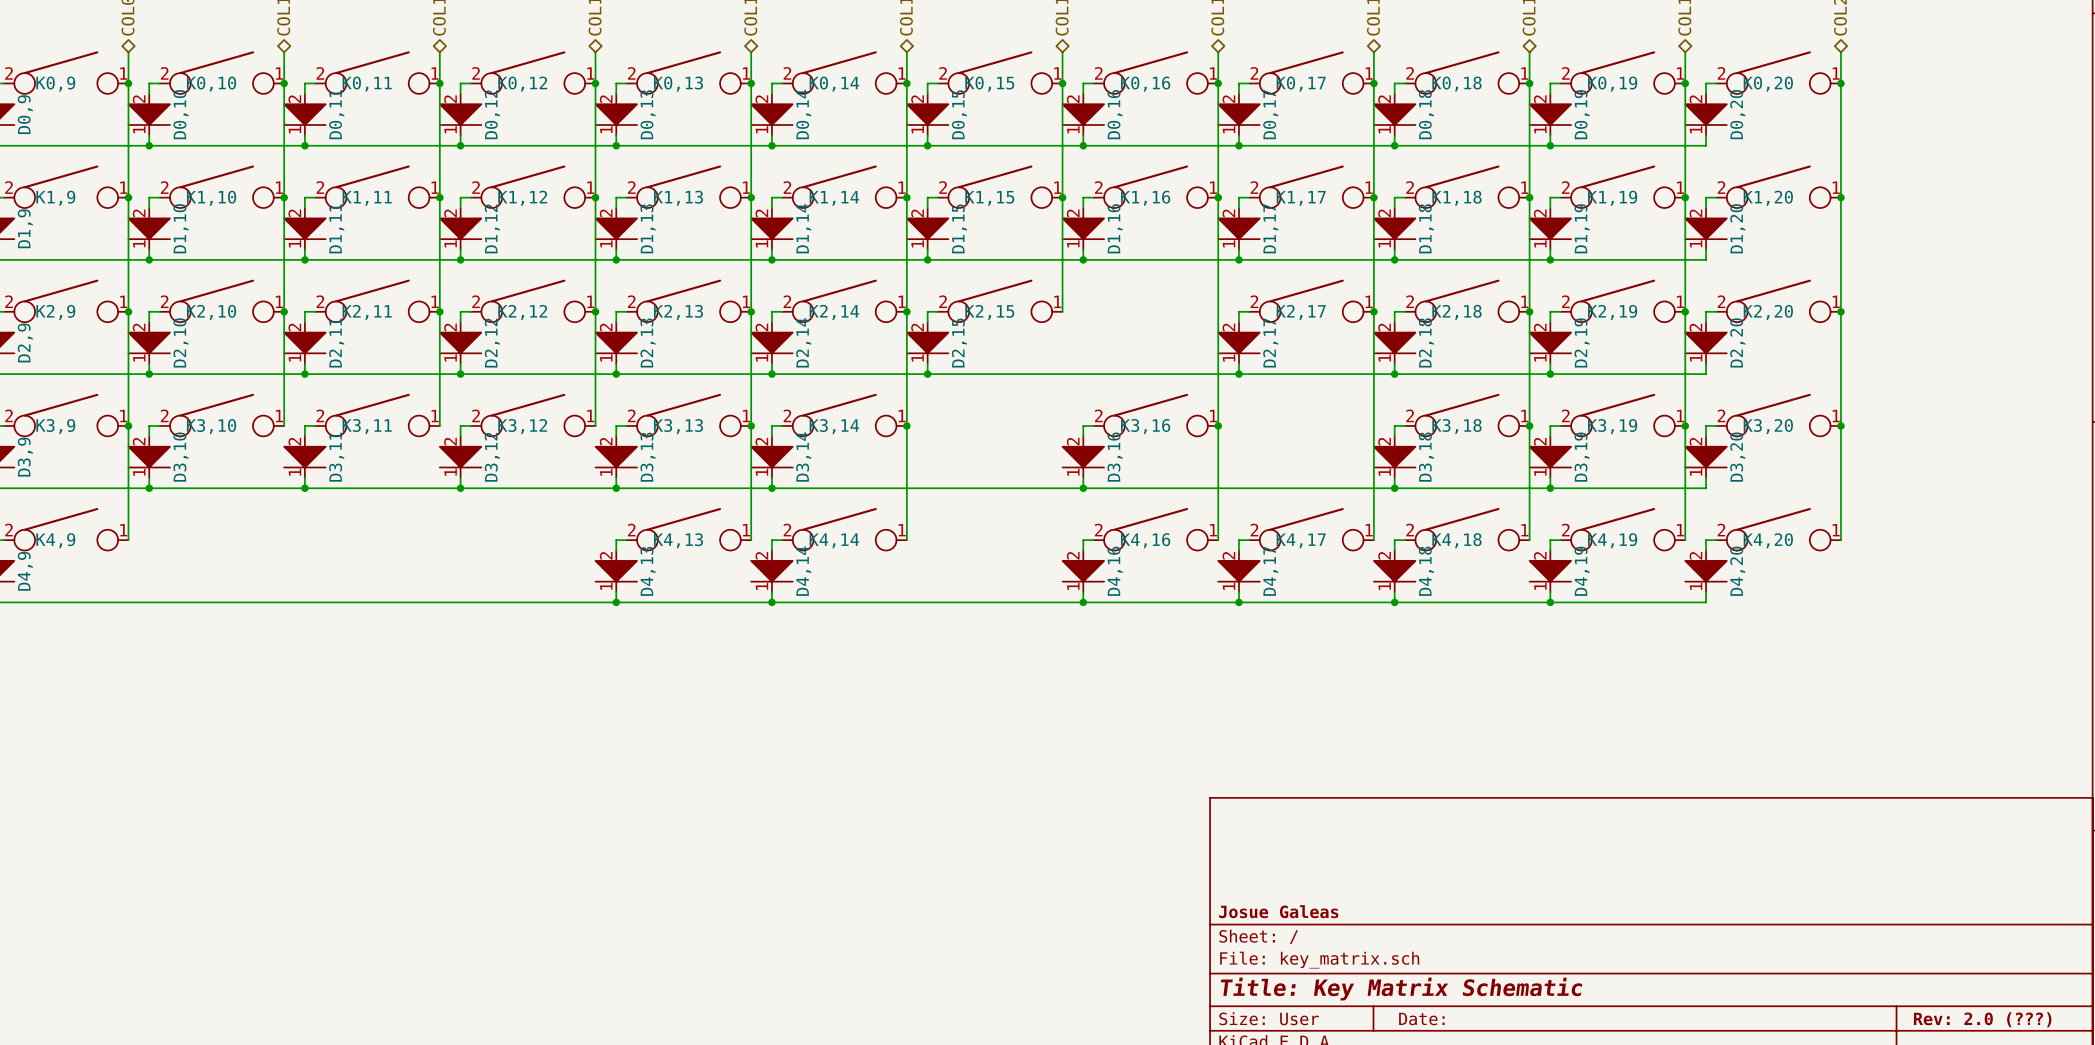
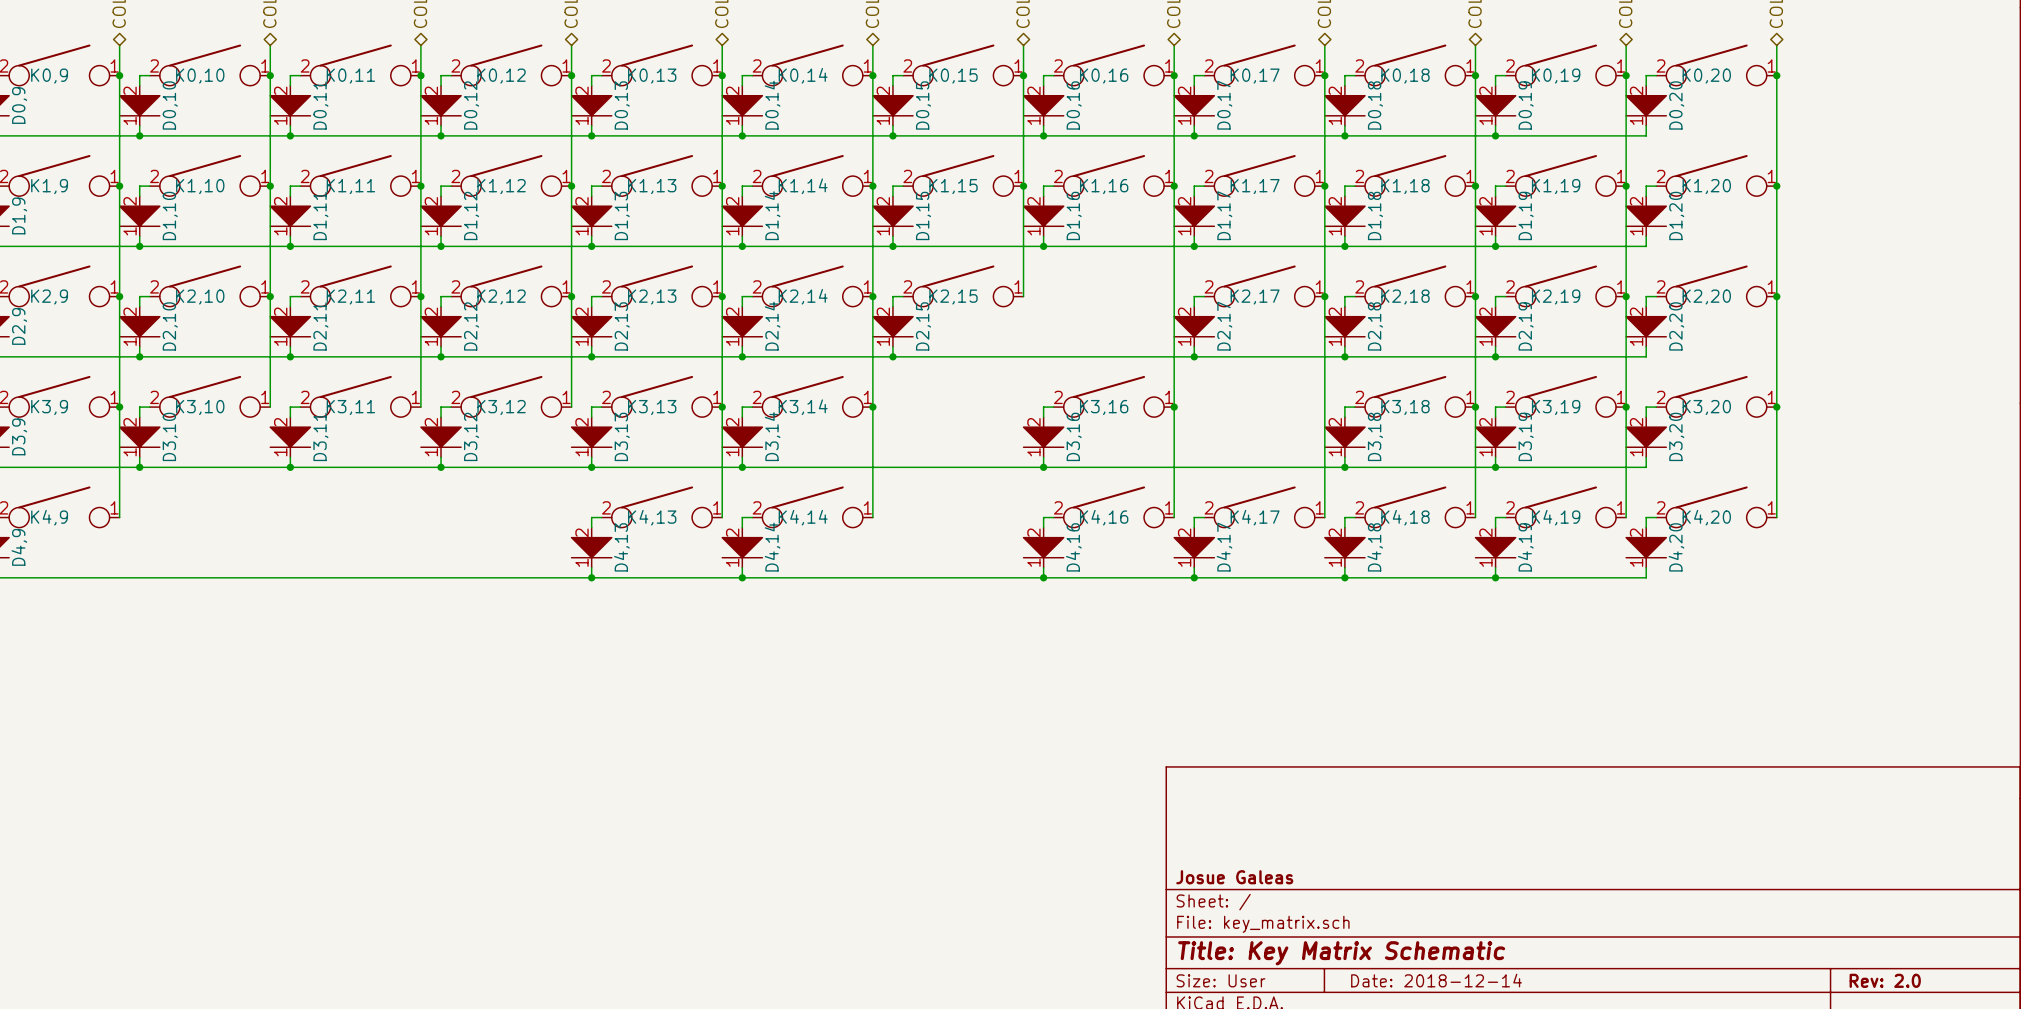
title block: Date: (1421, 1019) -> Date: 2018-12-14 (1436, 980)
title block: Rev: 2.0 (???) (1982, 1019) -> Rev: 2.0 (1885, 980)

